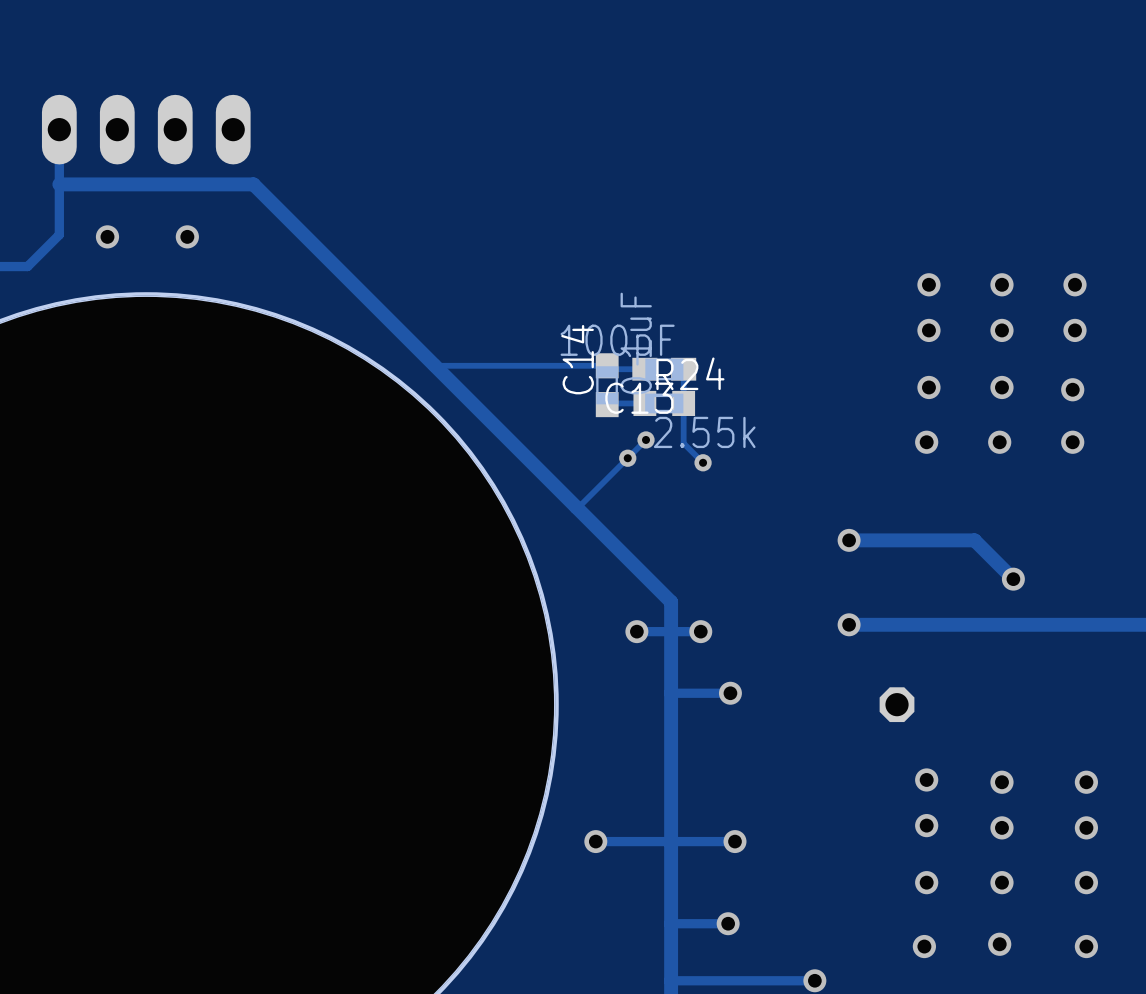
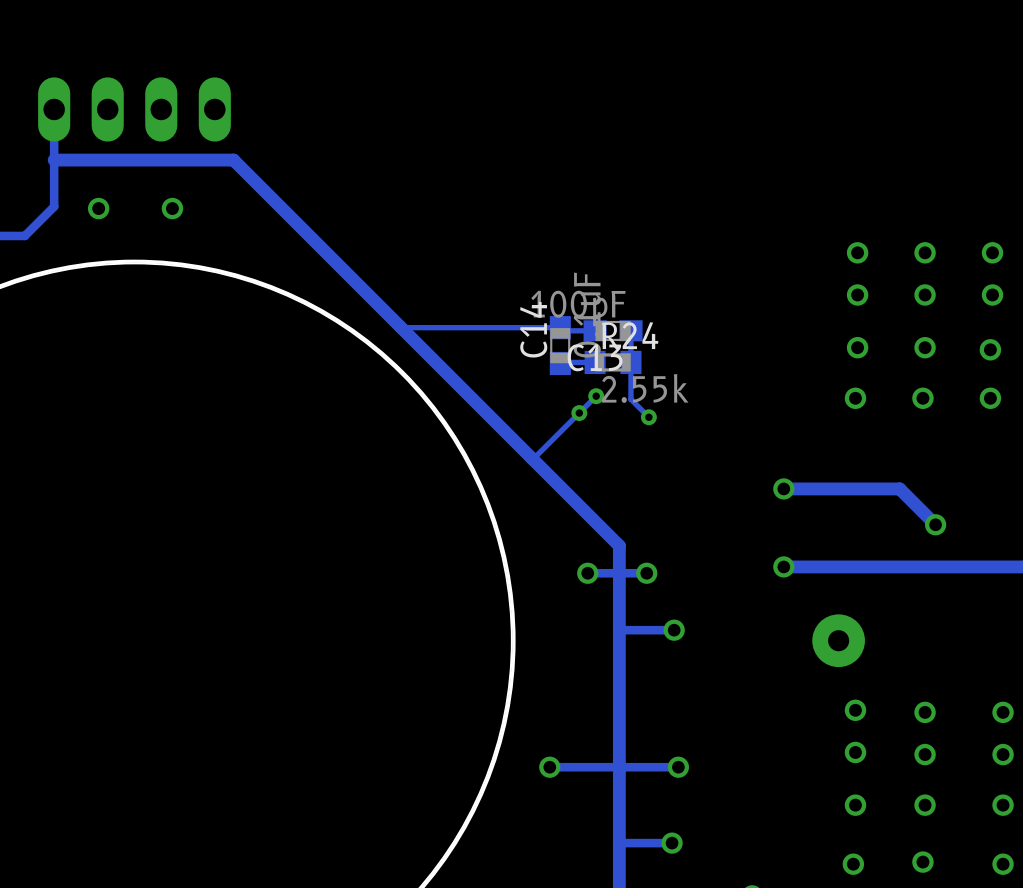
part: (897, 704) -> none
via: none -> (838, 640)

